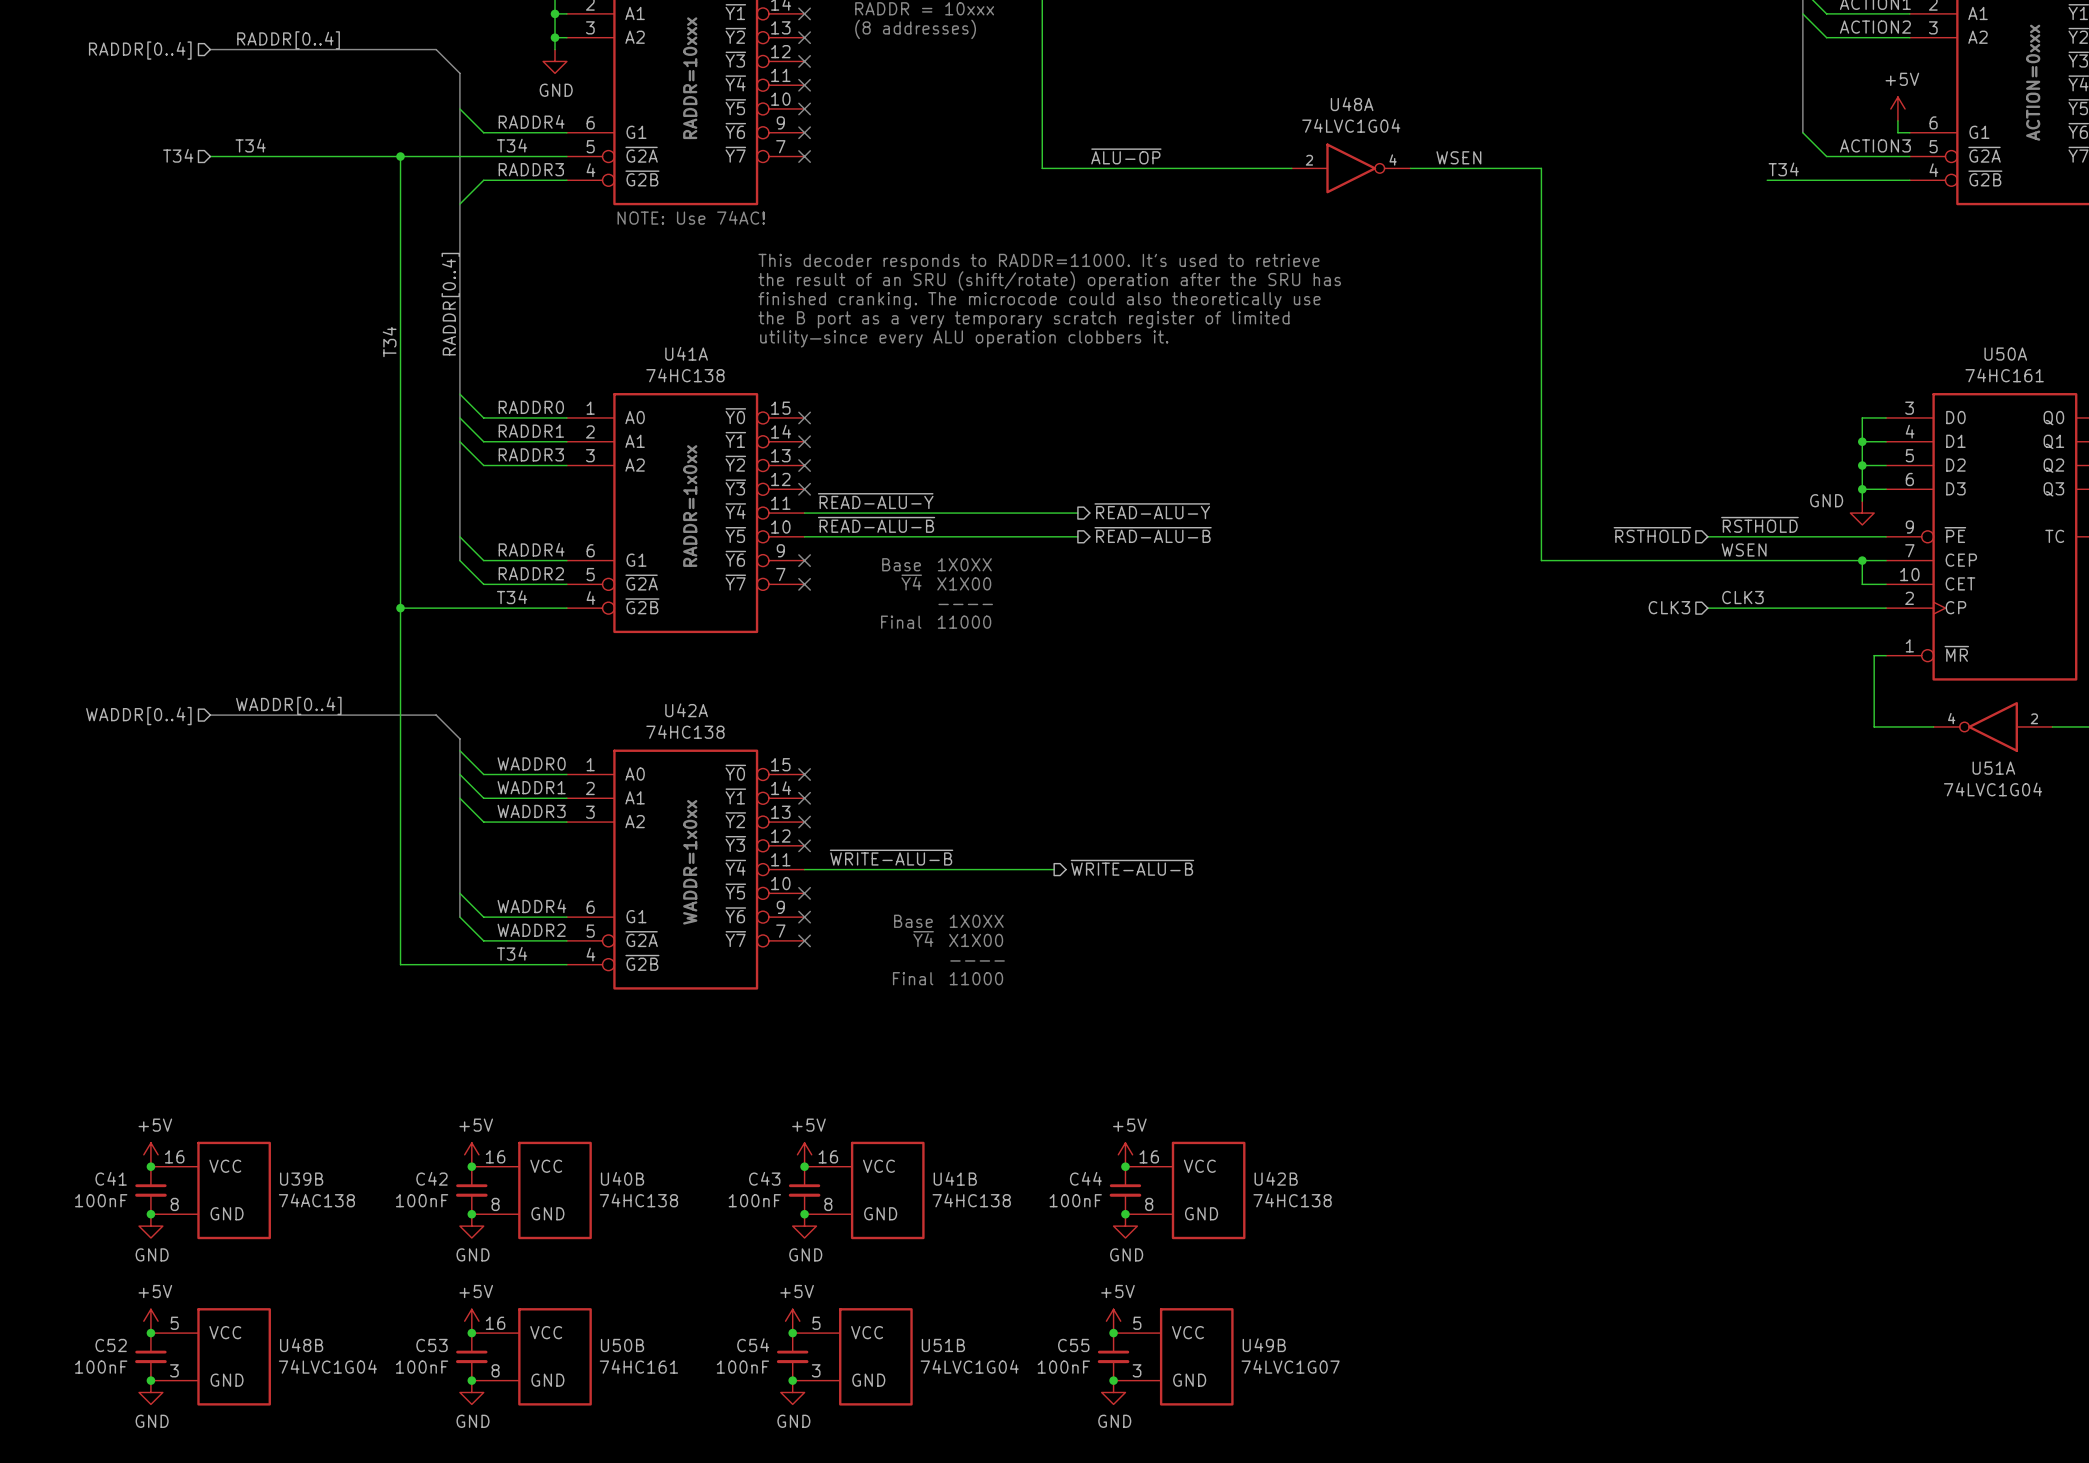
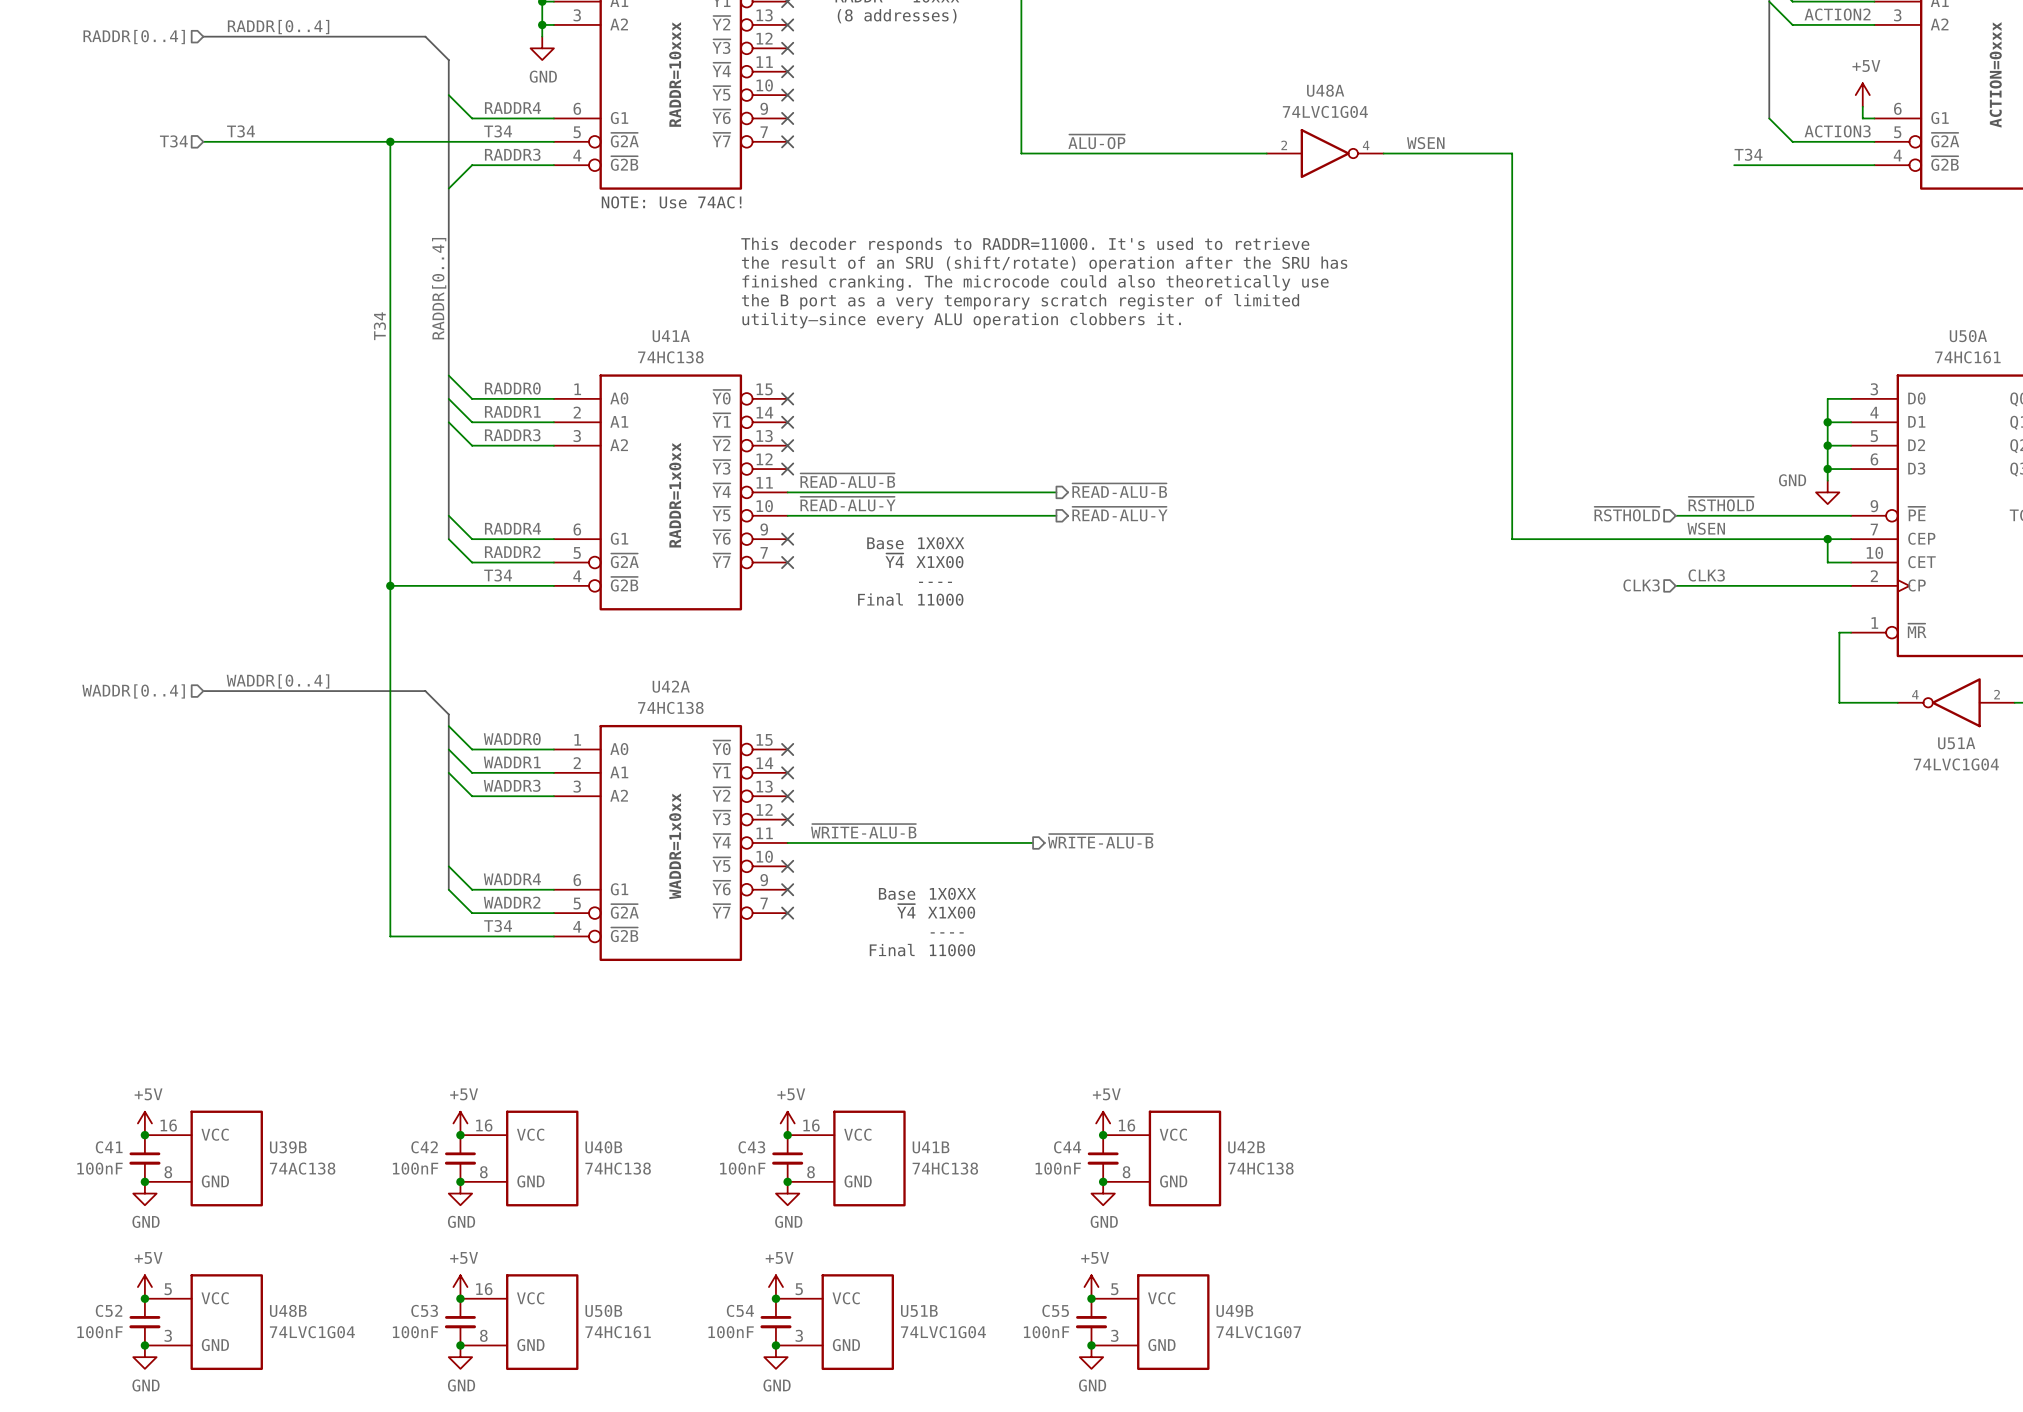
label: ~{READ-ALU-Y} (875, 501) -> ~{READ-ALU-B} (847, 480)
hierarchical label: ~{READ-ALU-Y} (1152, 511) -> ~{READ-ALU-B} (1119, 490)
label: ~{READ-ALU-B} (876, 524) -> ~{READ-ALU-Y} (848, 504)
hierarchical label: ~{READ-ALU-B} (1153, 535) -> ~{READ-ALU-Y} (1119, 514)

